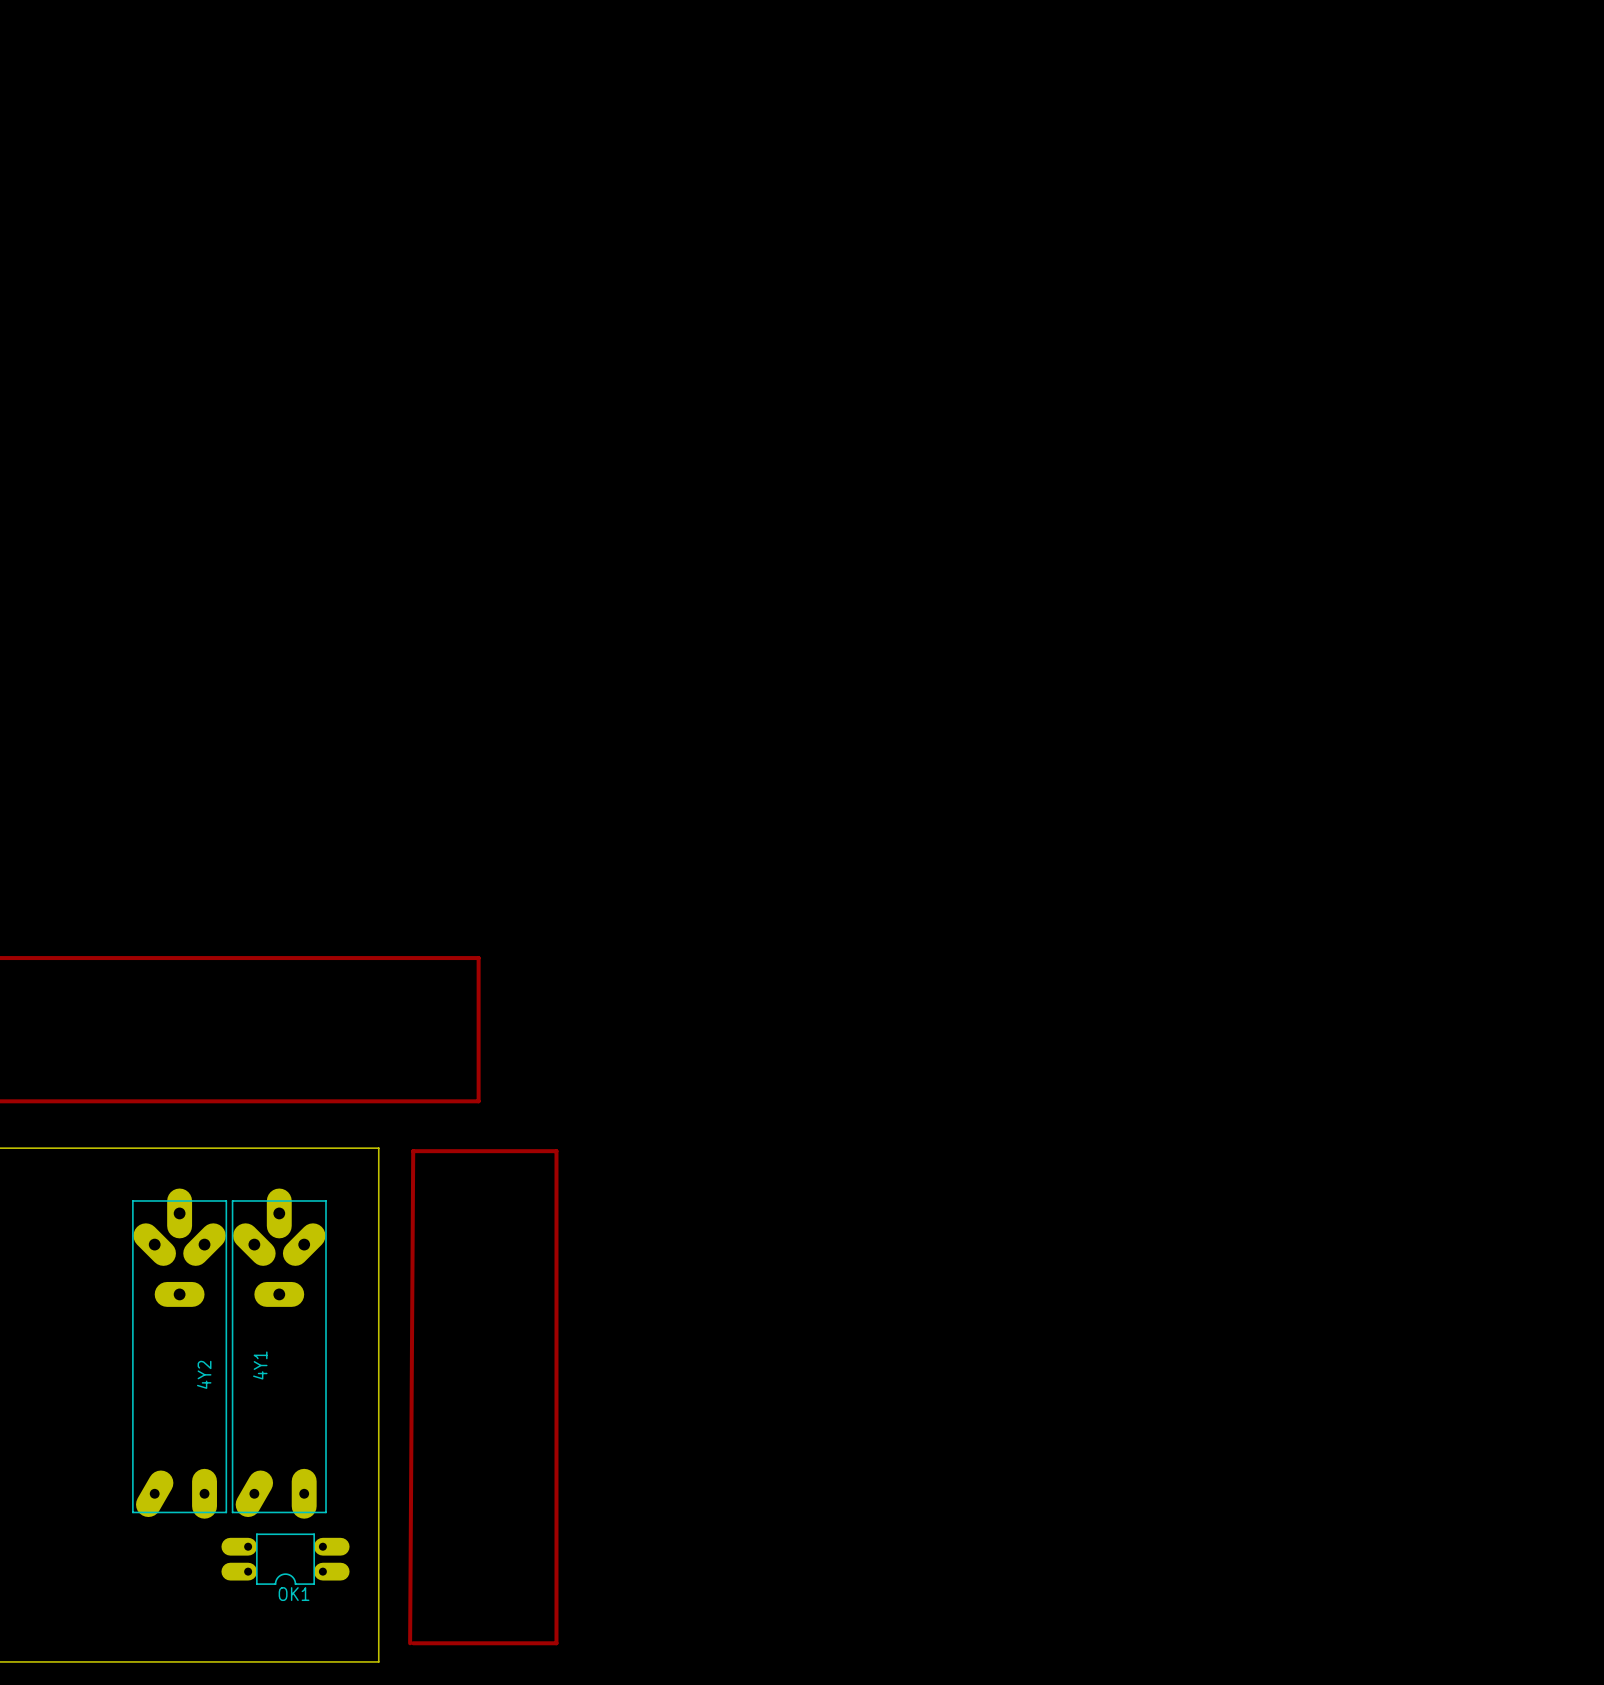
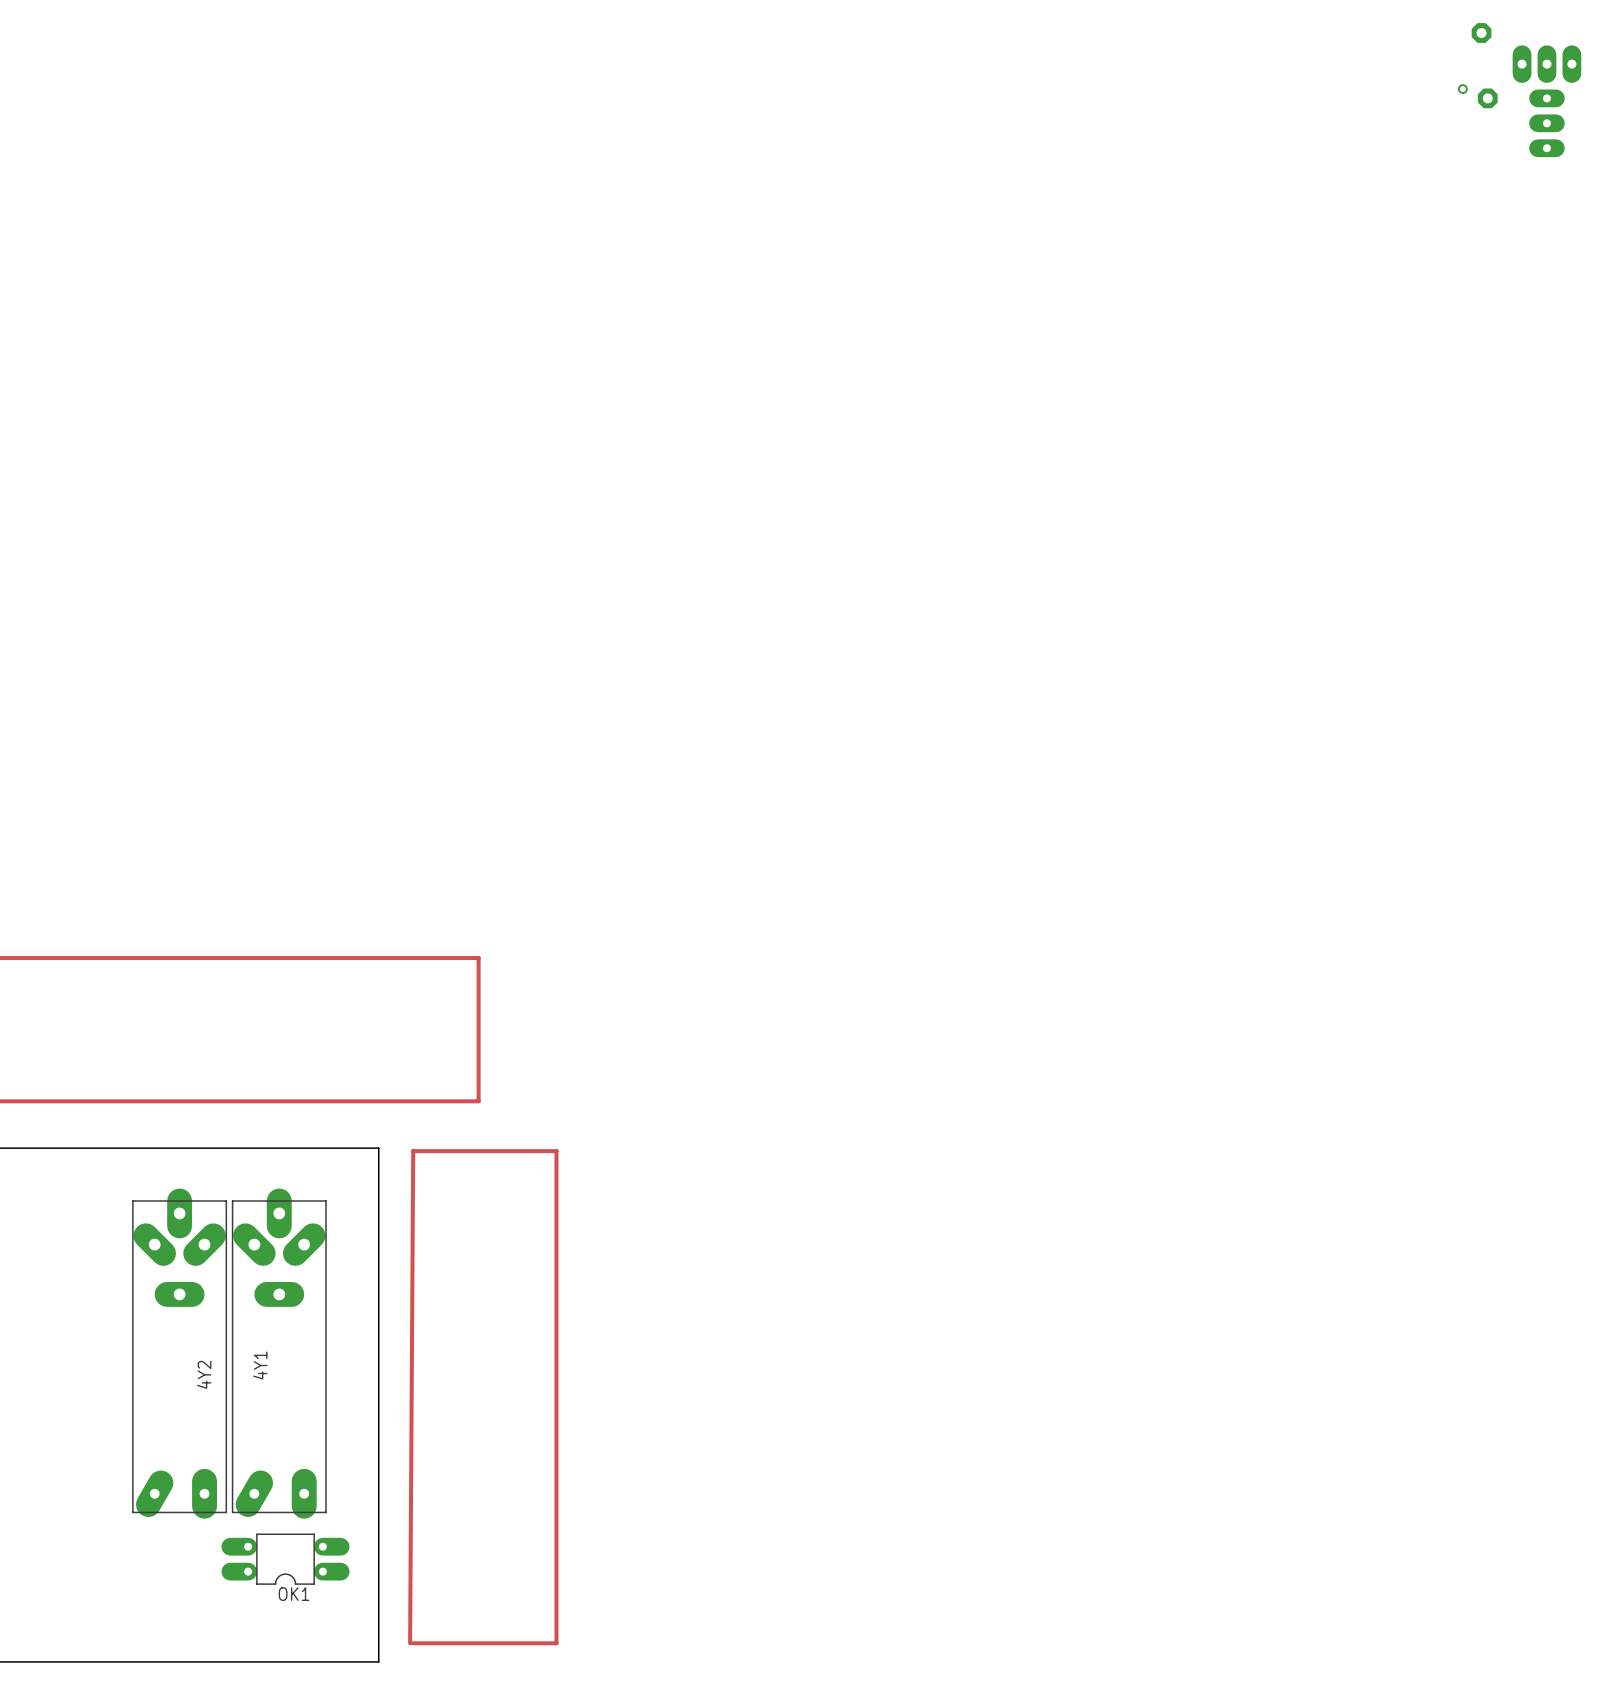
part: none -> (1481, 32)
part: none -> (1546, 64)
via: none -> (1462, 89)
part: none -> (1487, 98)
part: none -> (1546, 123)

